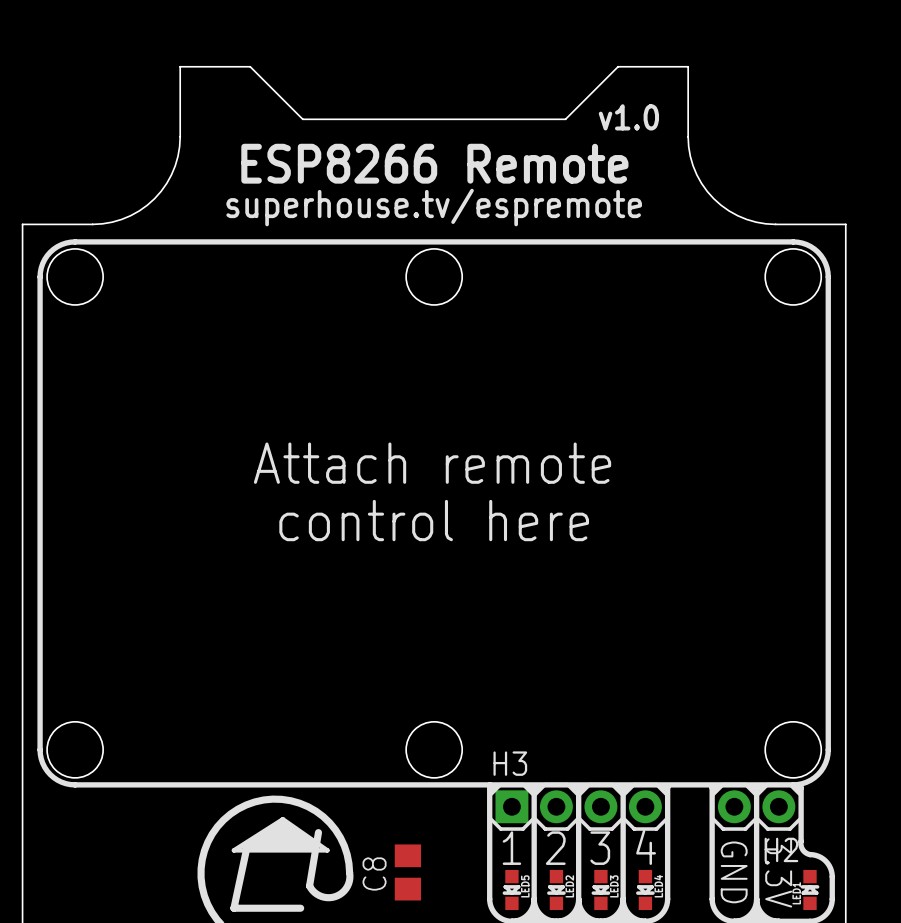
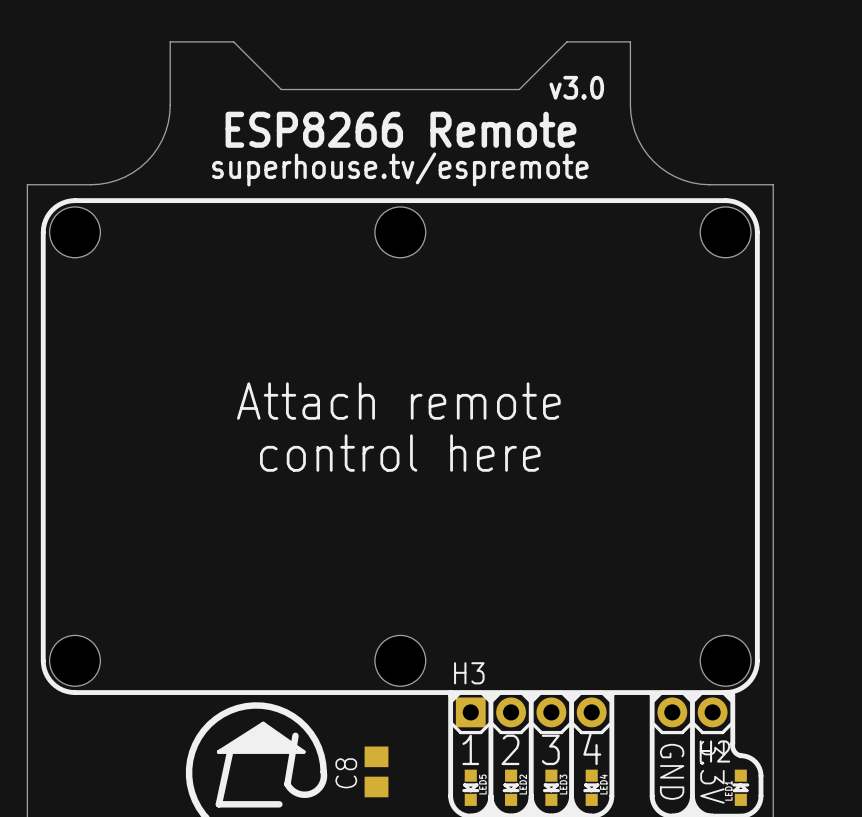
text: v1.0 (628, 117) -> v3.0 (576, 87)

